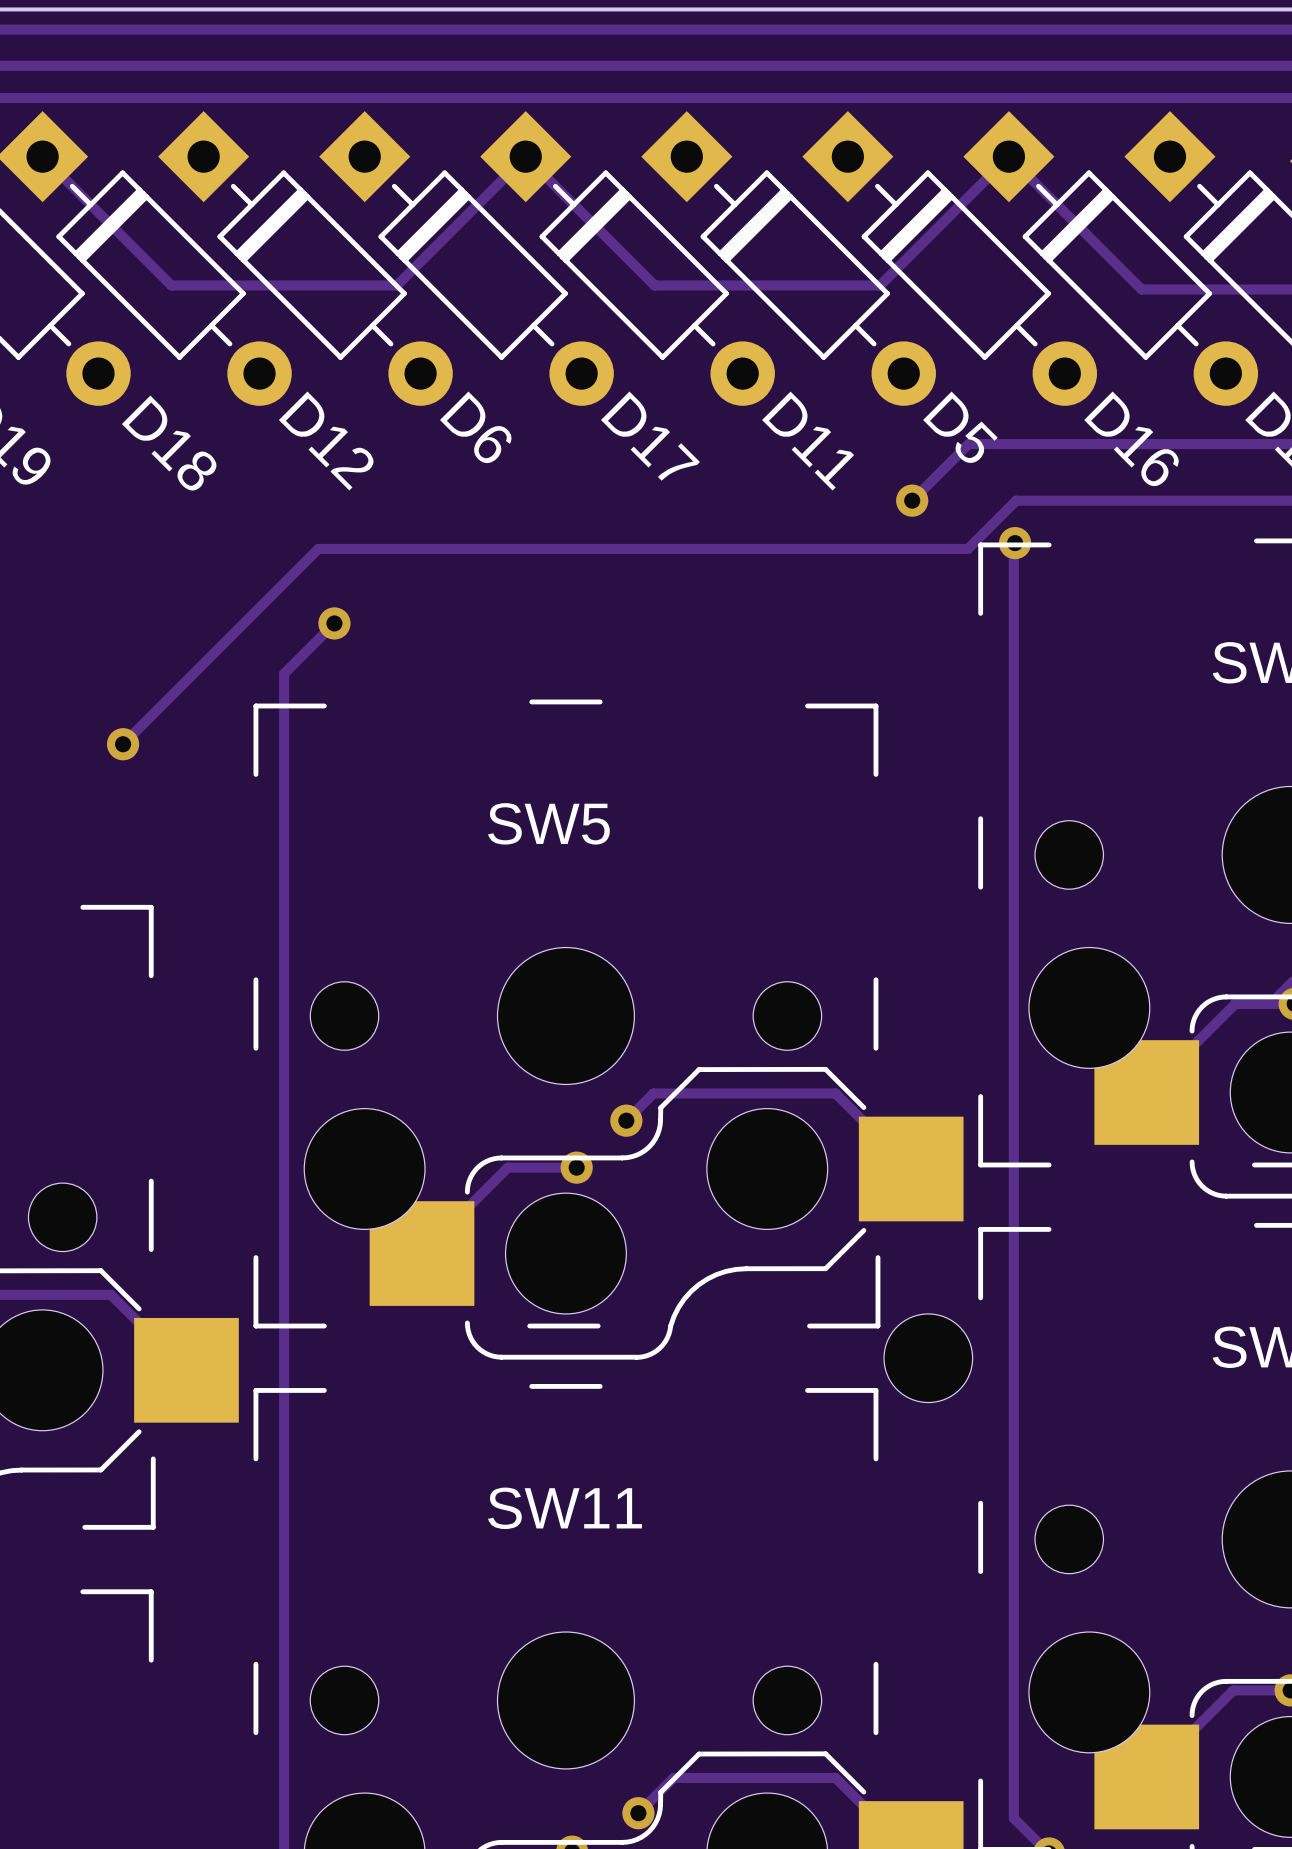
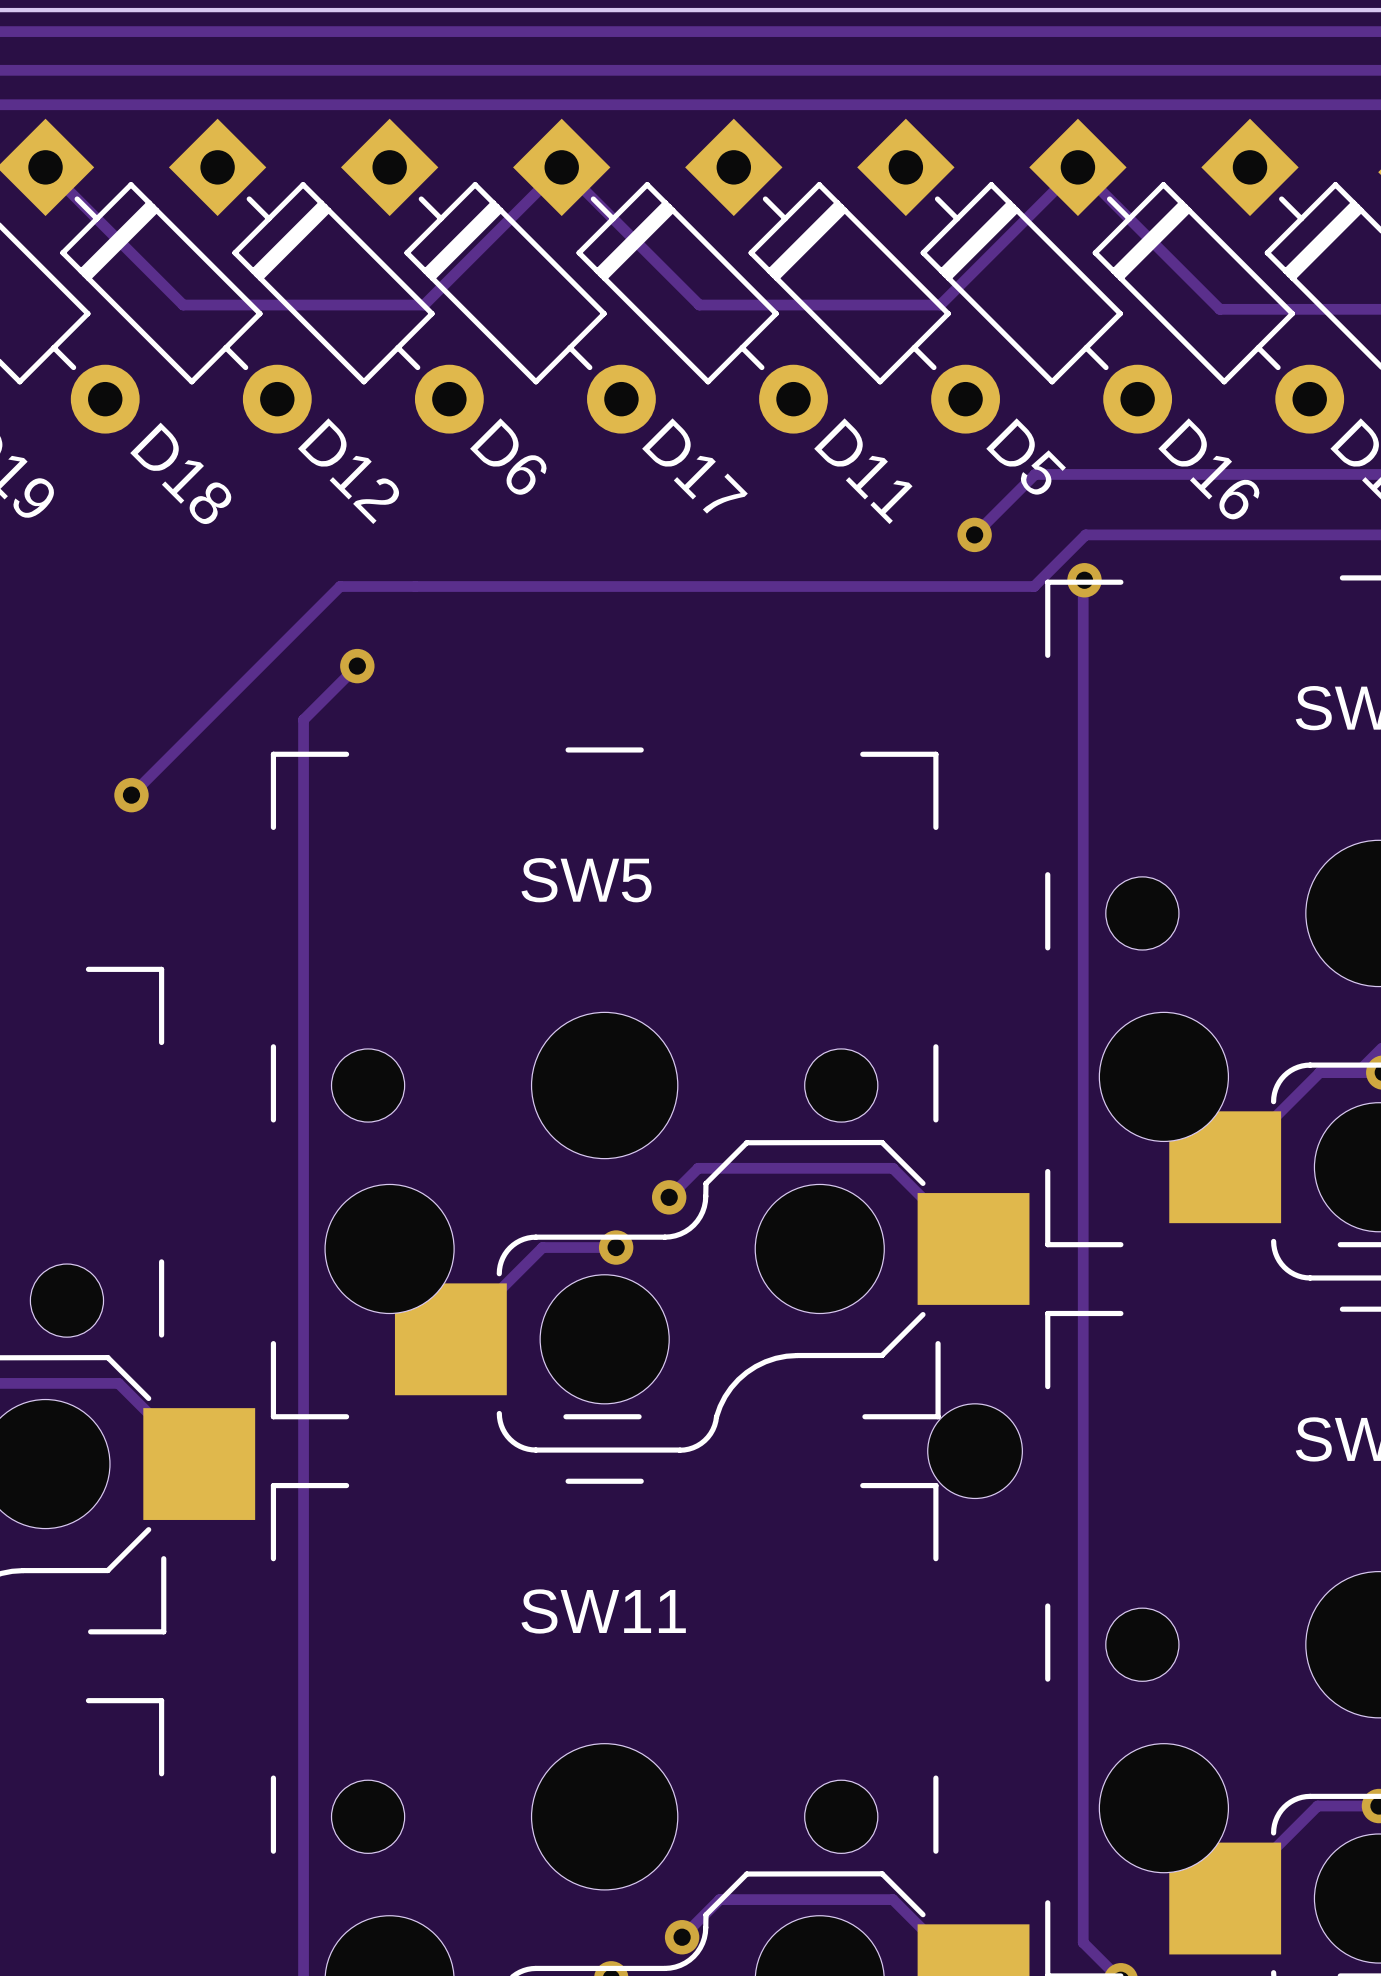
part position: (928, 1358) -> (975, 1451)

